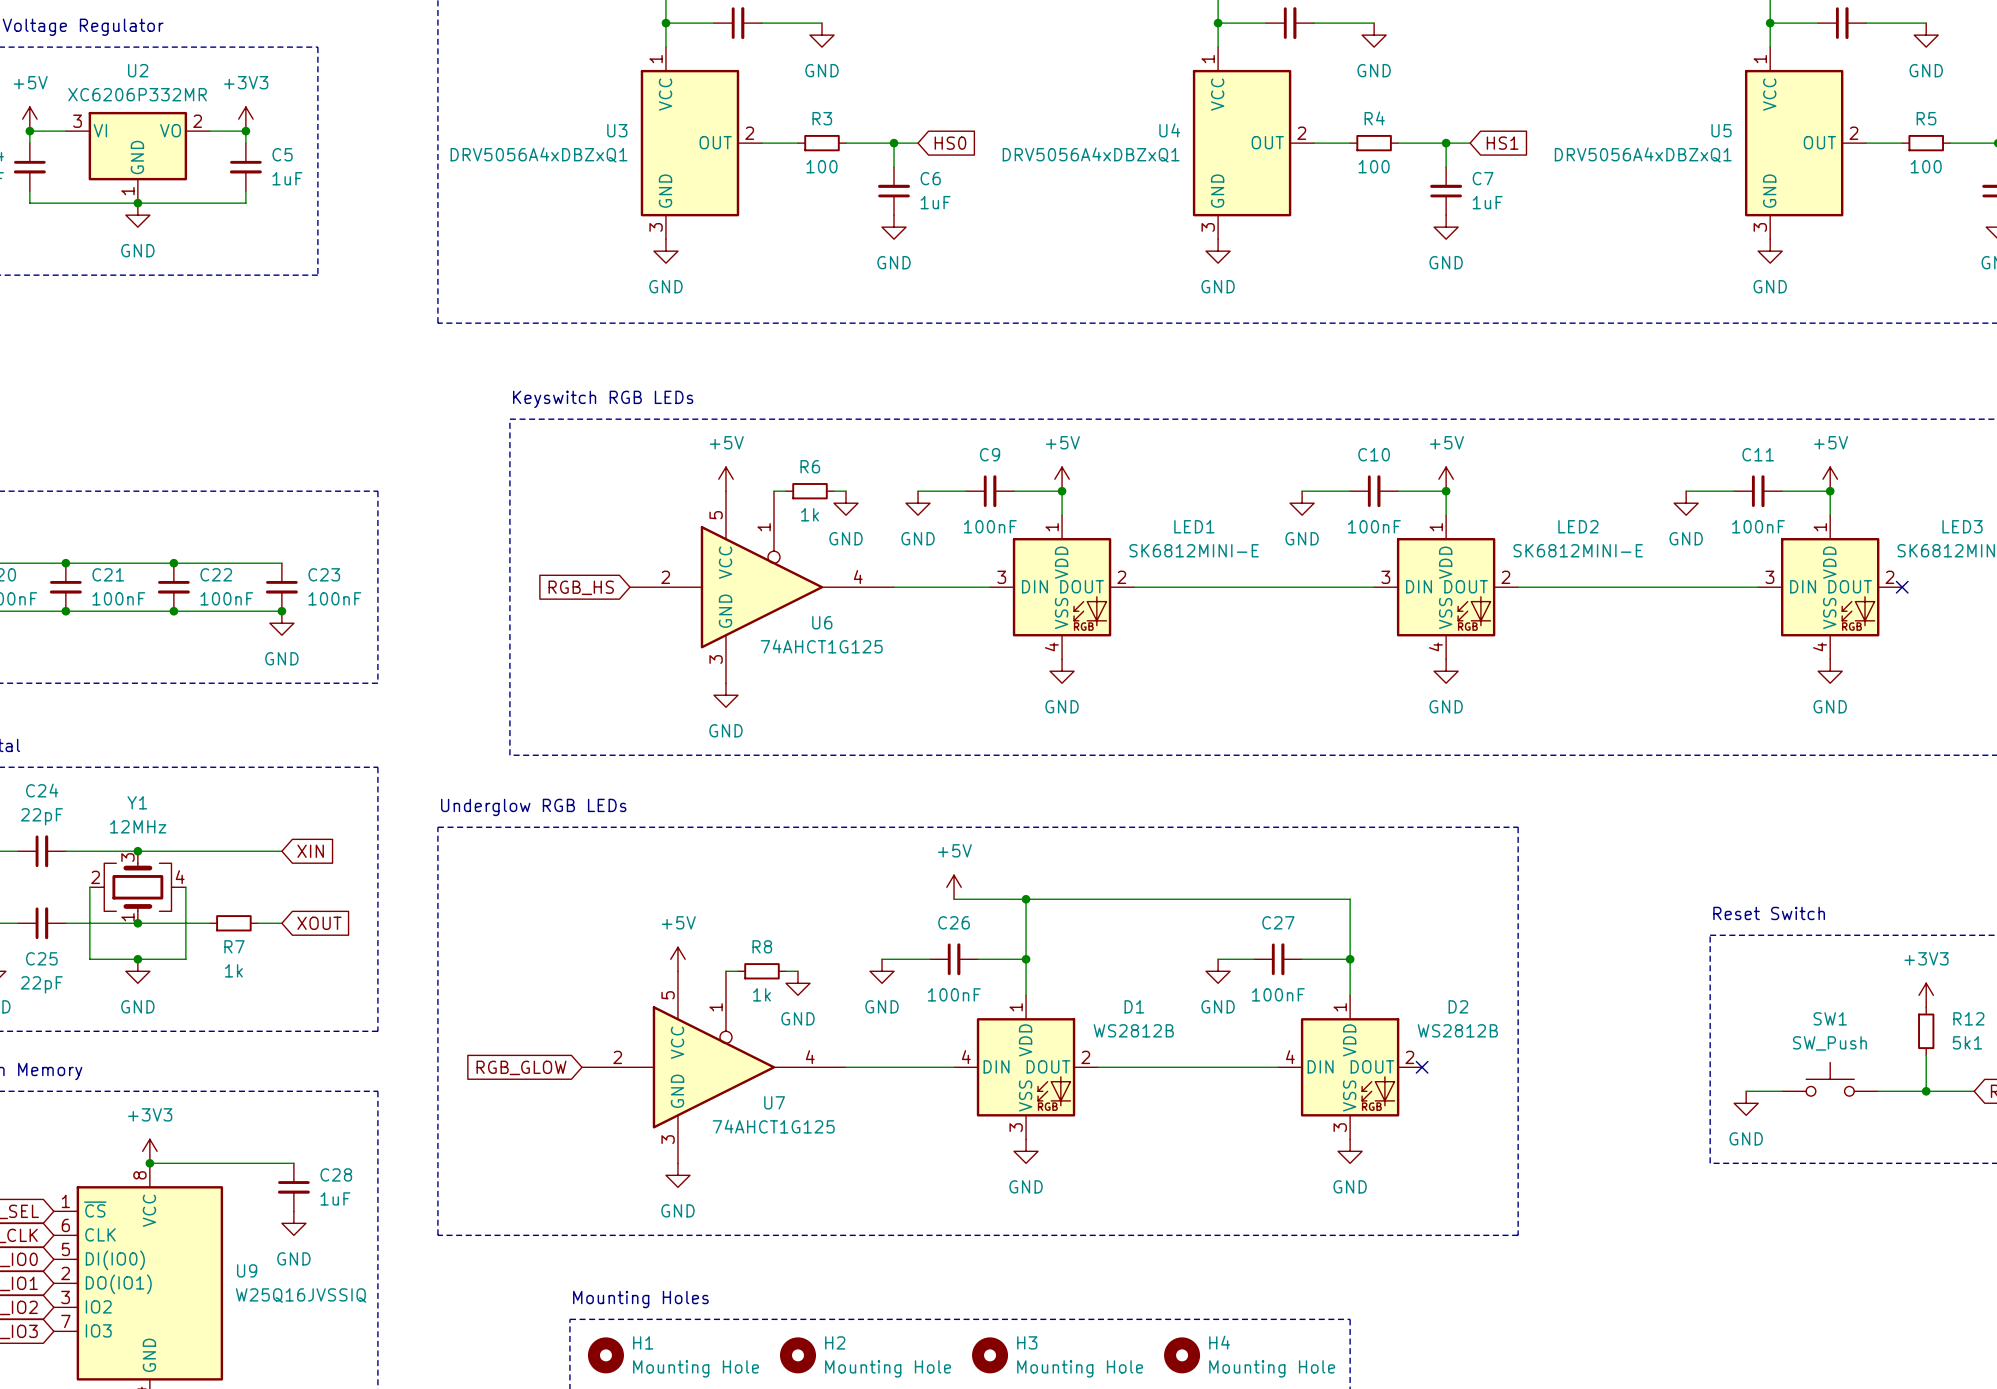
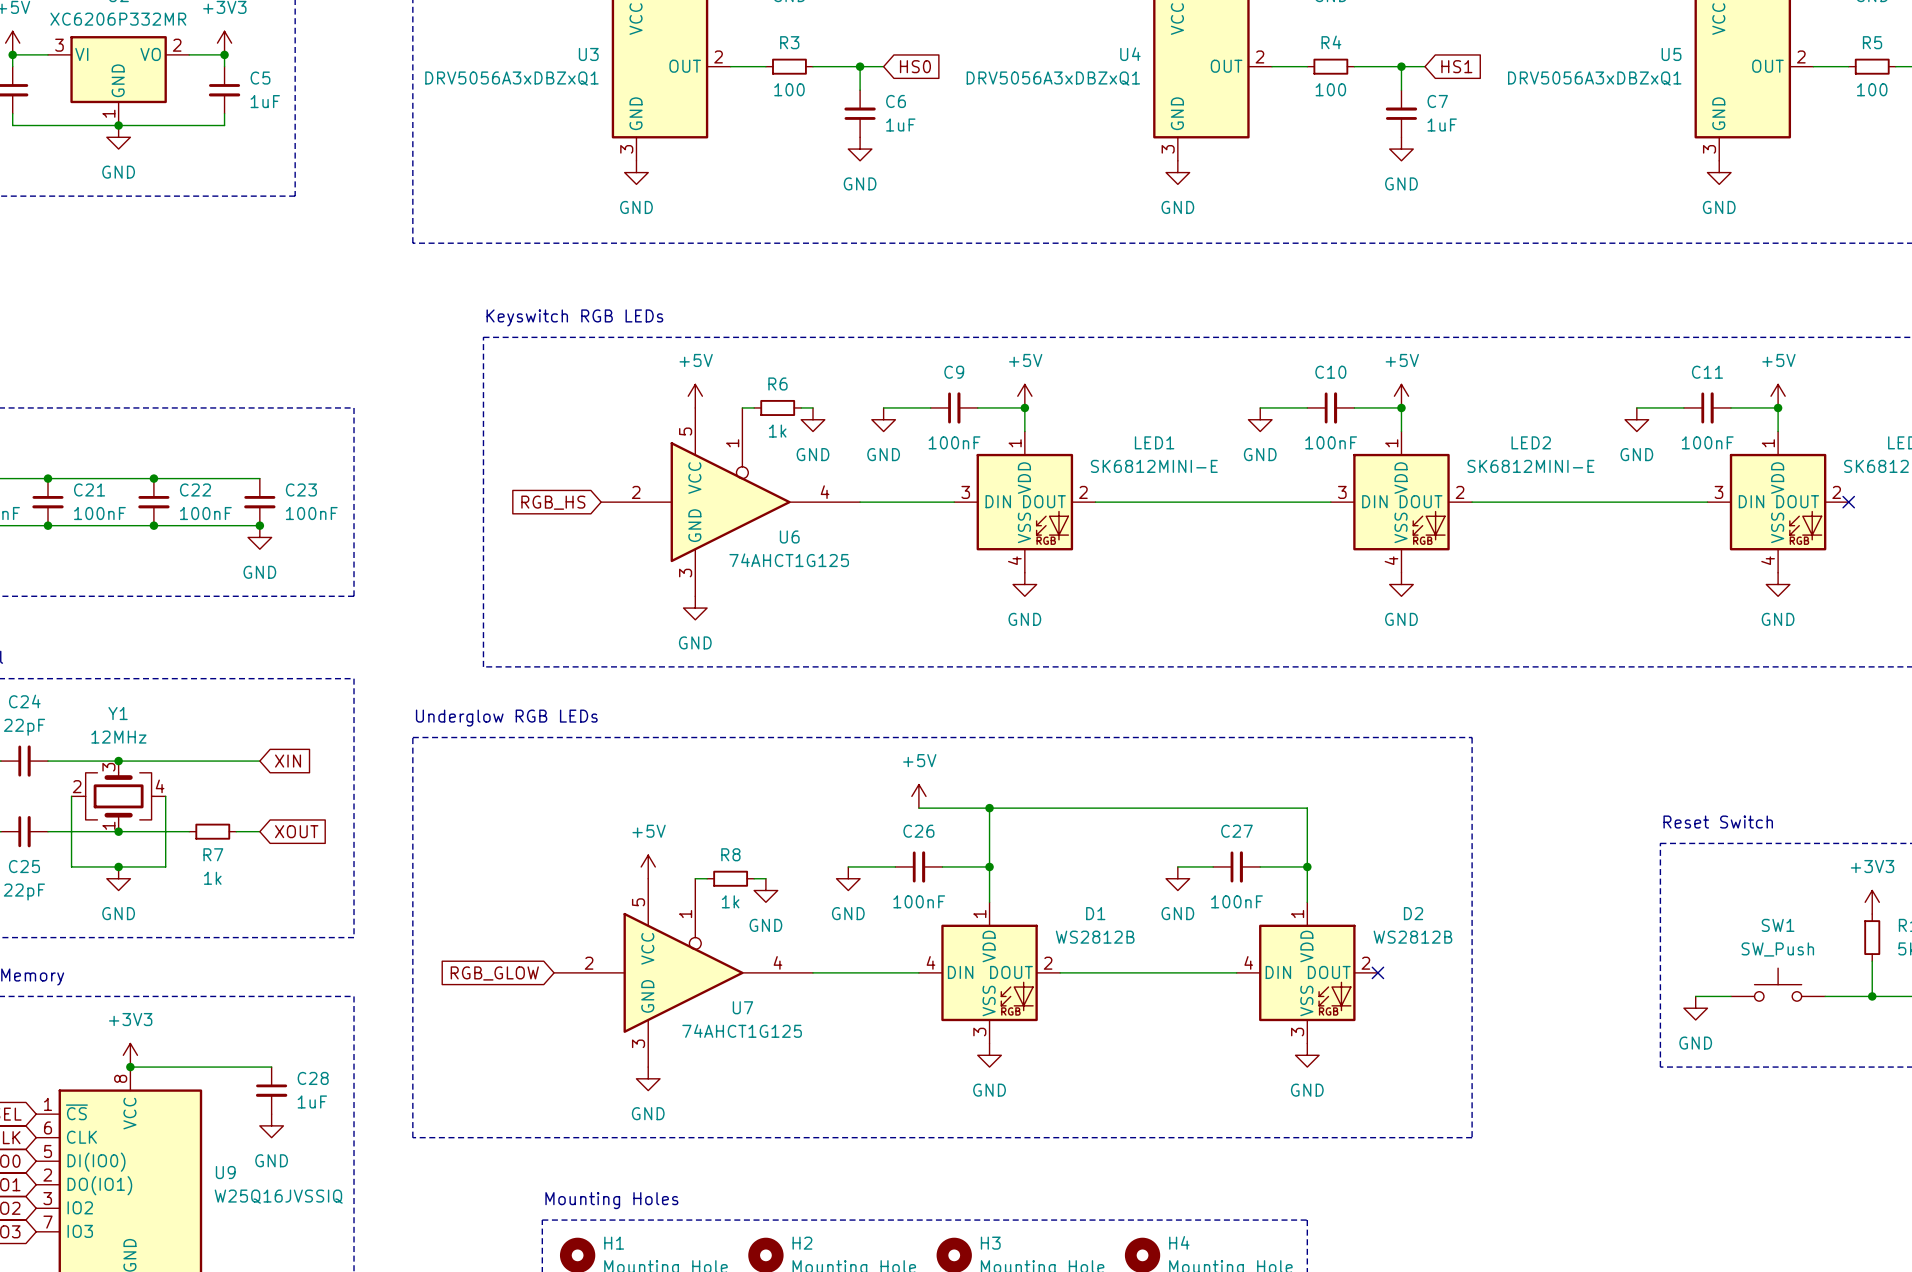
U3 value: DRV5056A4xDBZxQ1 (539, 154) -> DRV5056A3xDBZxQ1 (511, 78)
U4 value: DRV5056A4xDBZxQ1 (1091, 154) -> DRV5056A3xDBZxQ1 (1053, 78)
U5 value: DRV5056A4xDBZxQ1 (1643, 154) -> DRV5056A3xDBZxQ1 (1594, 78)

